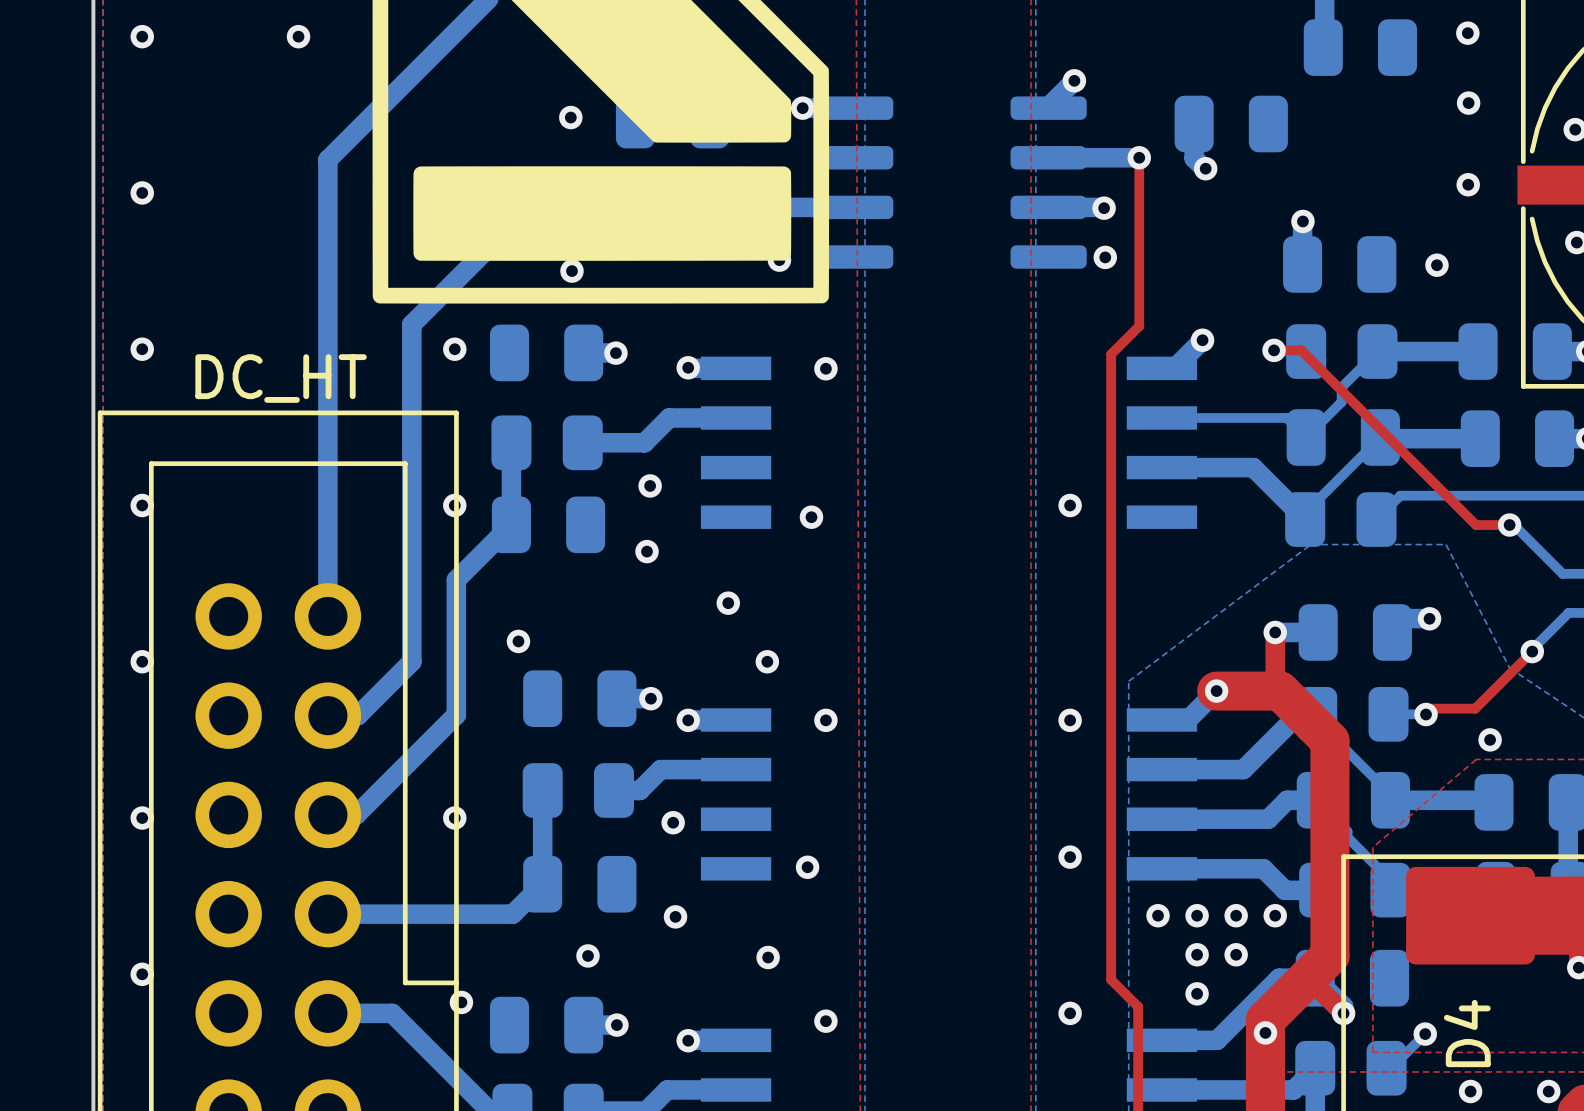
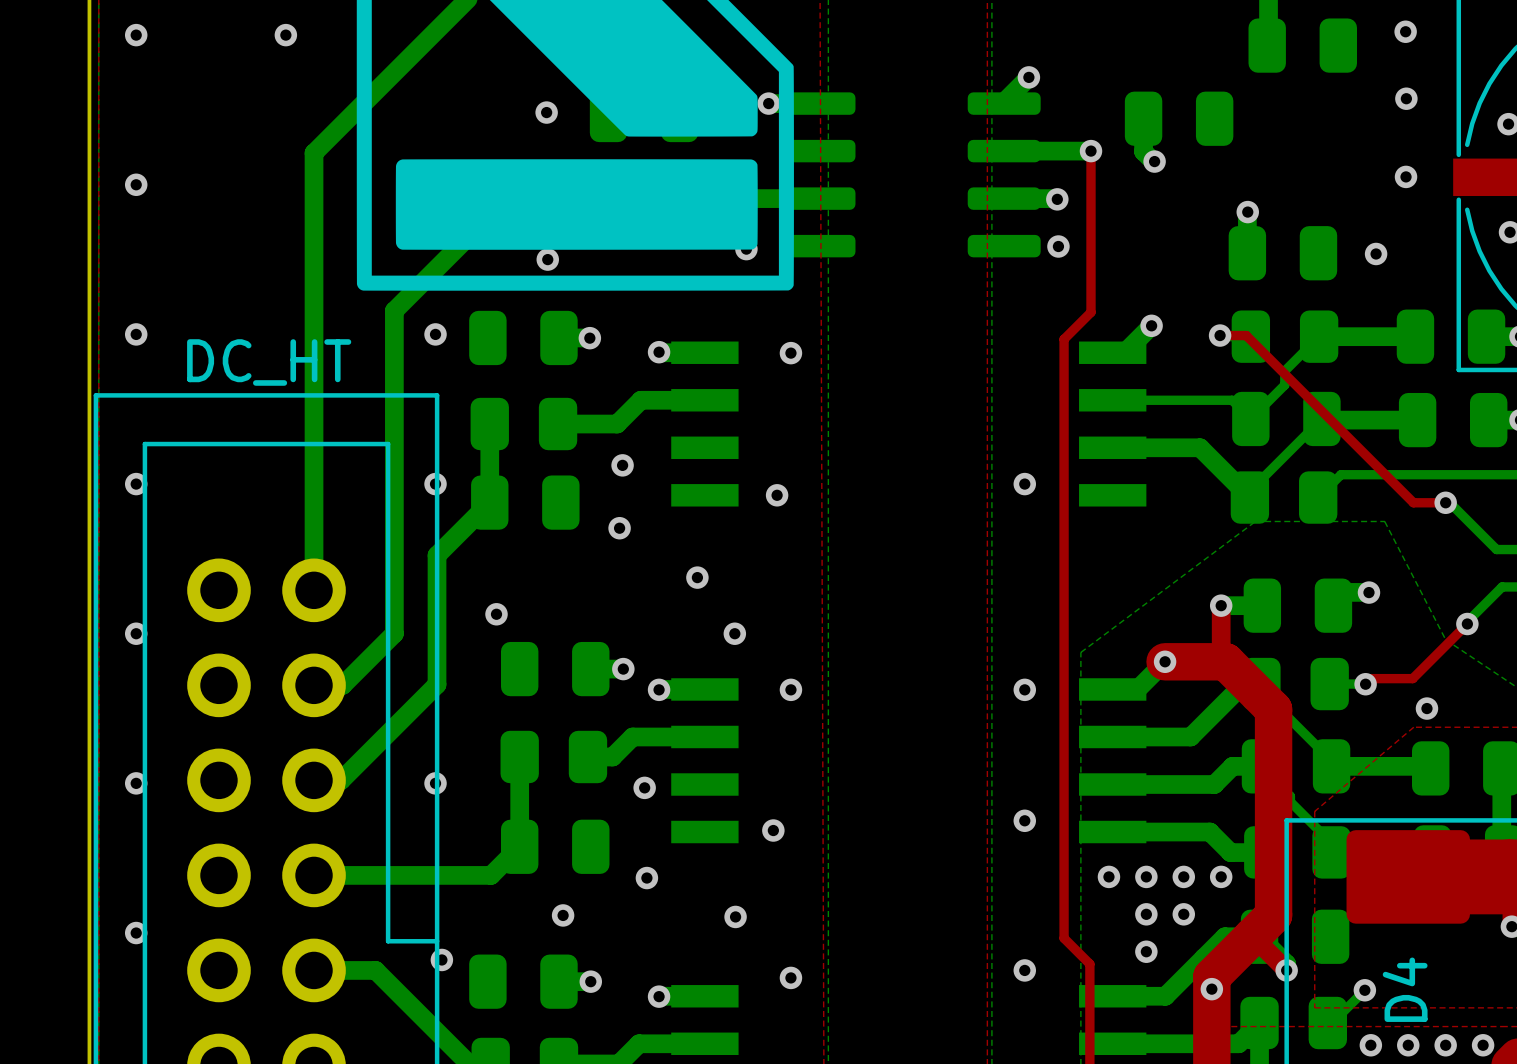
via: none -> (1370, 1045)
via: none -> (1445, 1045)

